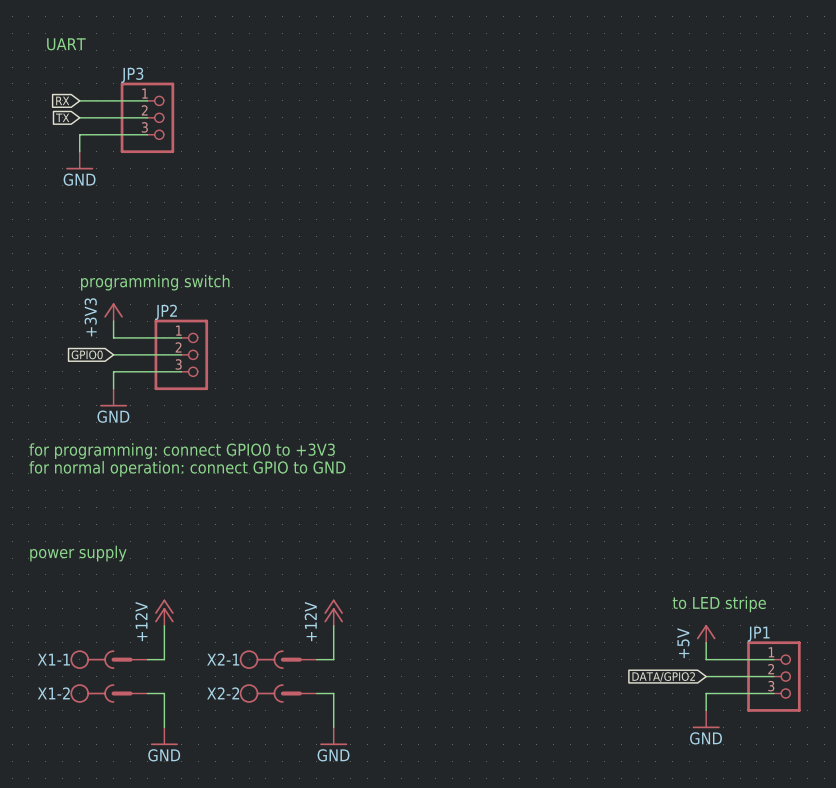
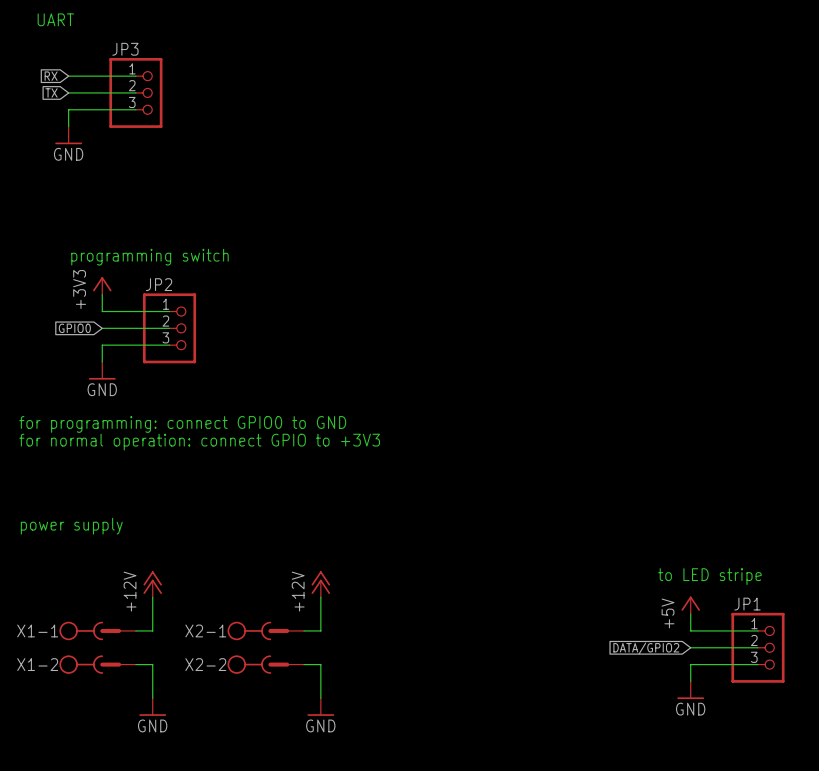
text: for programming: connect GPIO0 to +3V3 (182, 451) -> for programming: connect GPIO0 to GND (182, 424)
text: for normal operation: connect GPIO to GND (187, 468) -> for normal operation: connect GPIO to +3V3 (199, 442)

